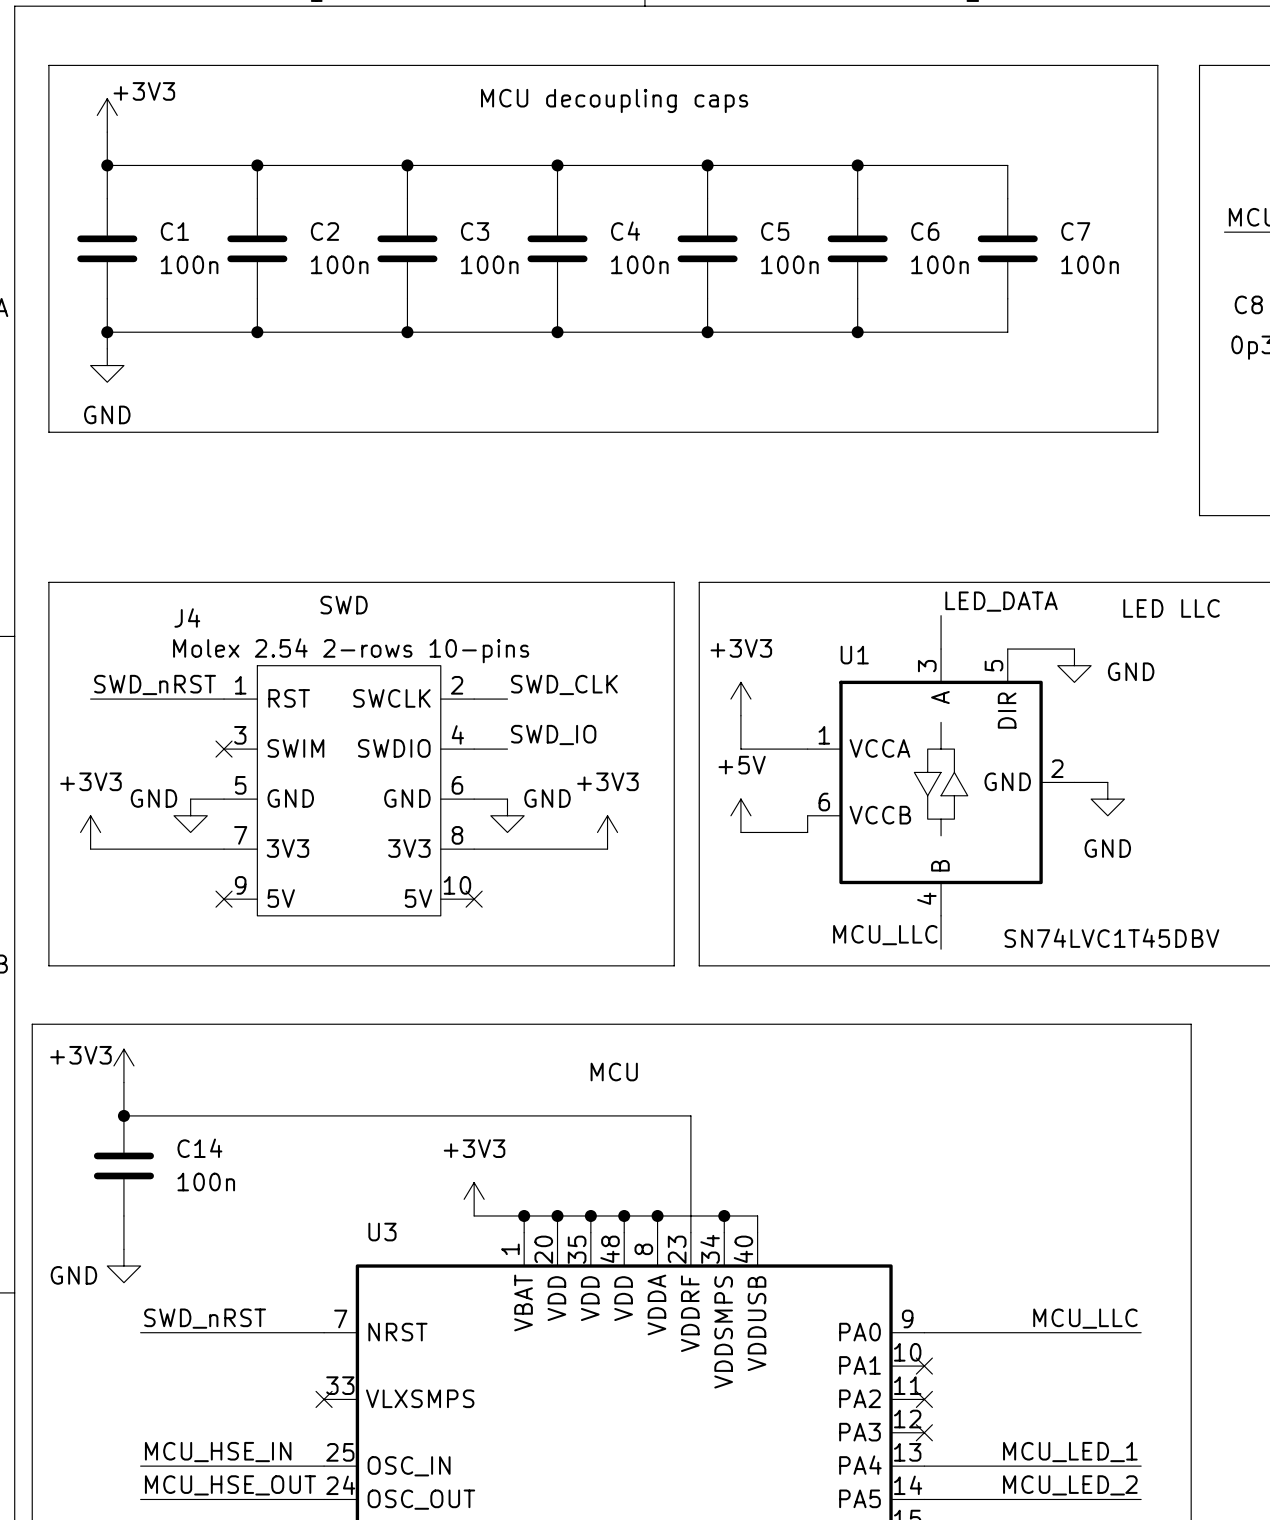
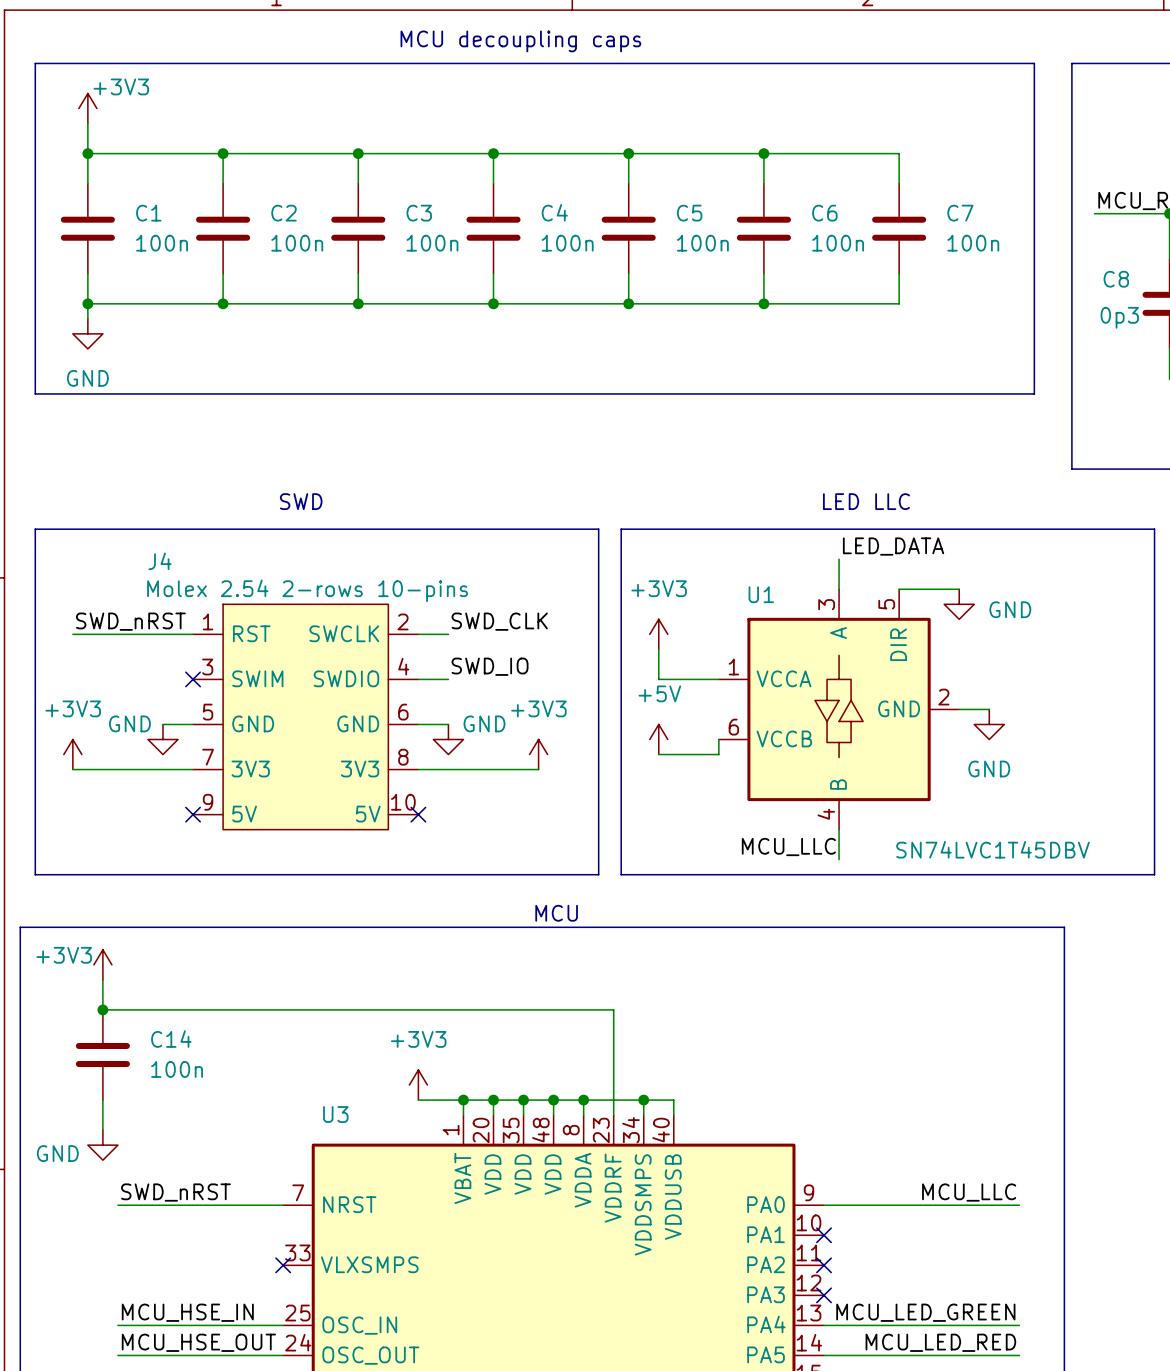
text position: MCU decoupling caps (614, 100) -> MCU decoupling caps (520, 41)
text position: SWD (344, 605) -> SWD (301, 501)
text position: LED LLC (1171, 608) -> LED LLC (866, 501)
text position: MCU (614, 1072) -> MCU (556, 913)
label: MCU_LED_1 (1070, 1452) -> MCU_LED_GREEN (925, 1312)
label: MCU_LED_2 (1070, 1485) -> MCU_LED_RED (940, 1342)

